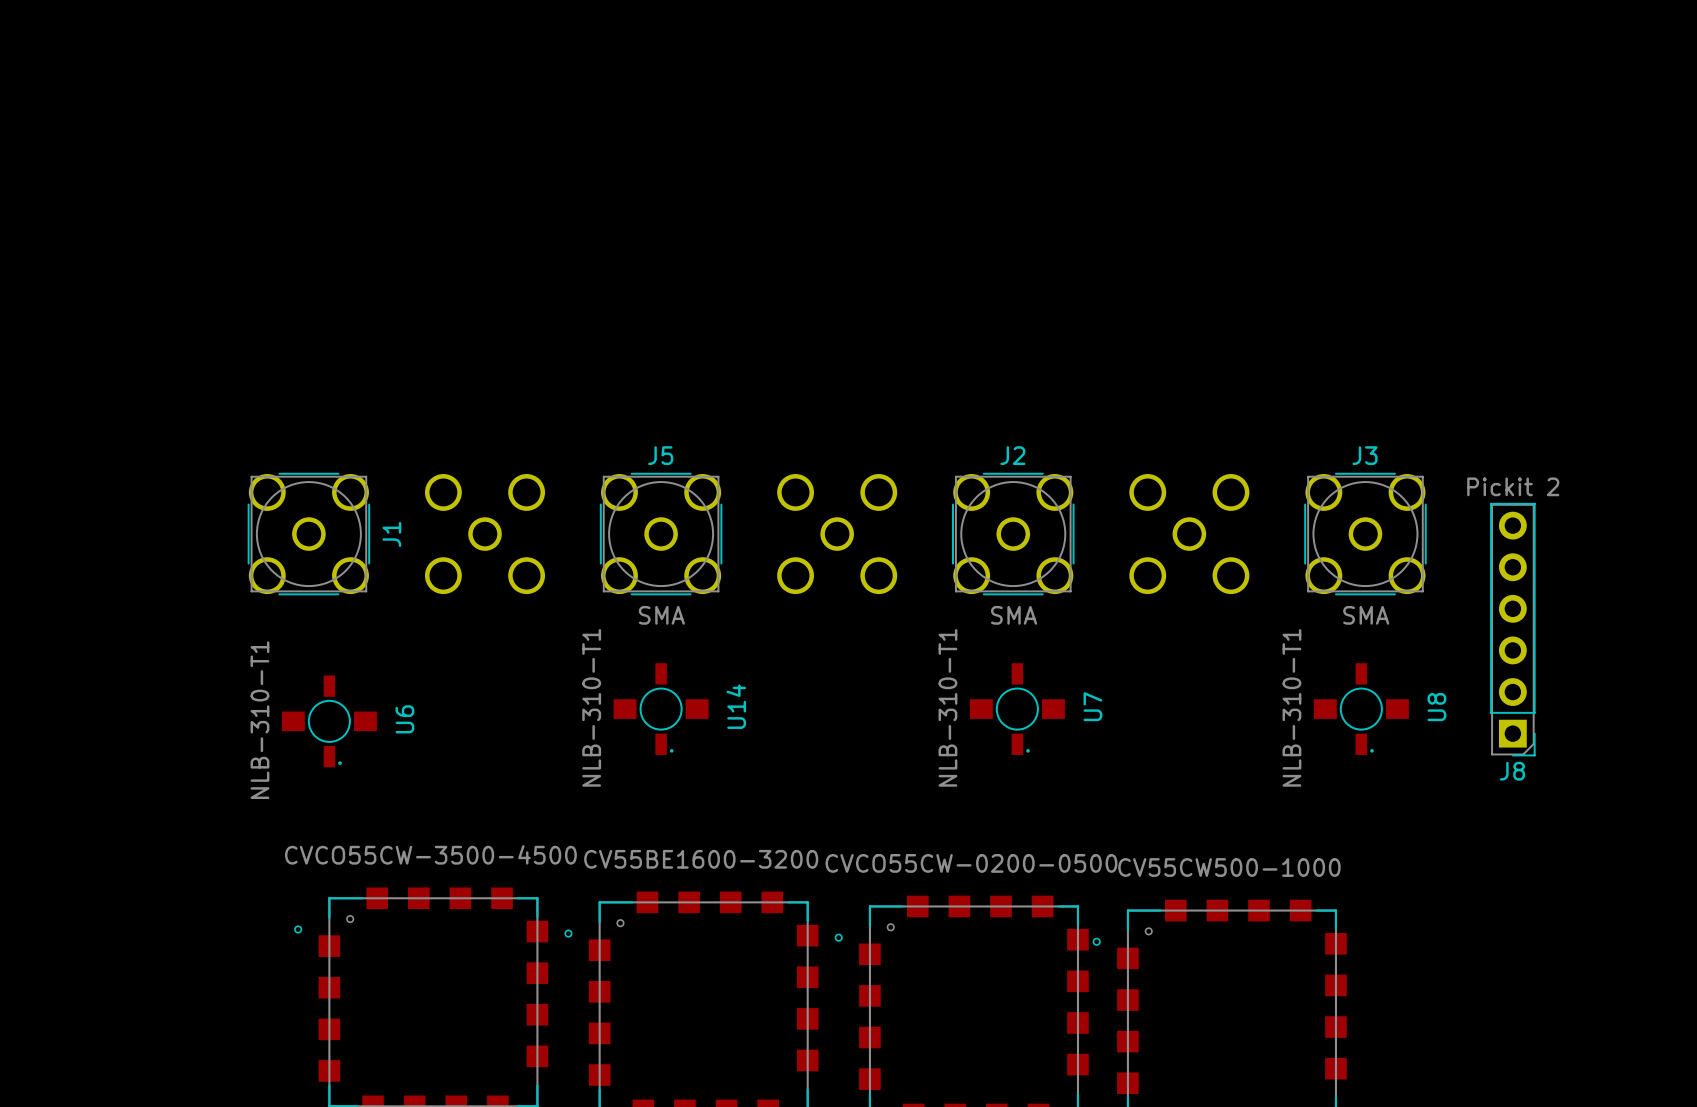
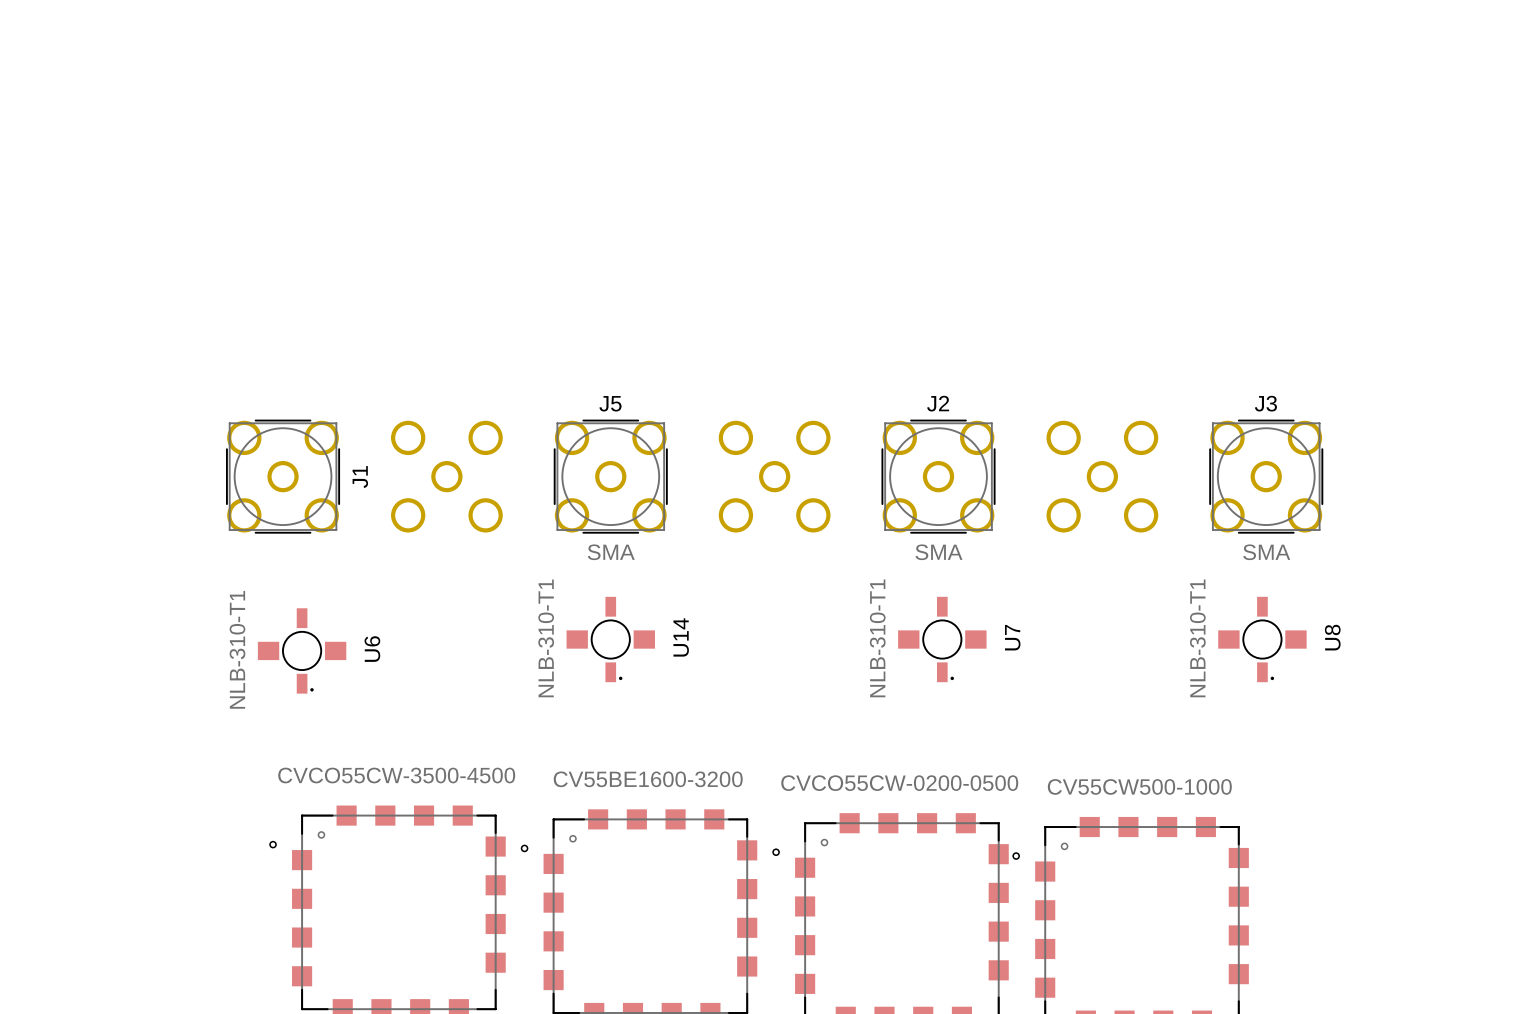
J8: Pickit 2 (1512, 629) -> none

